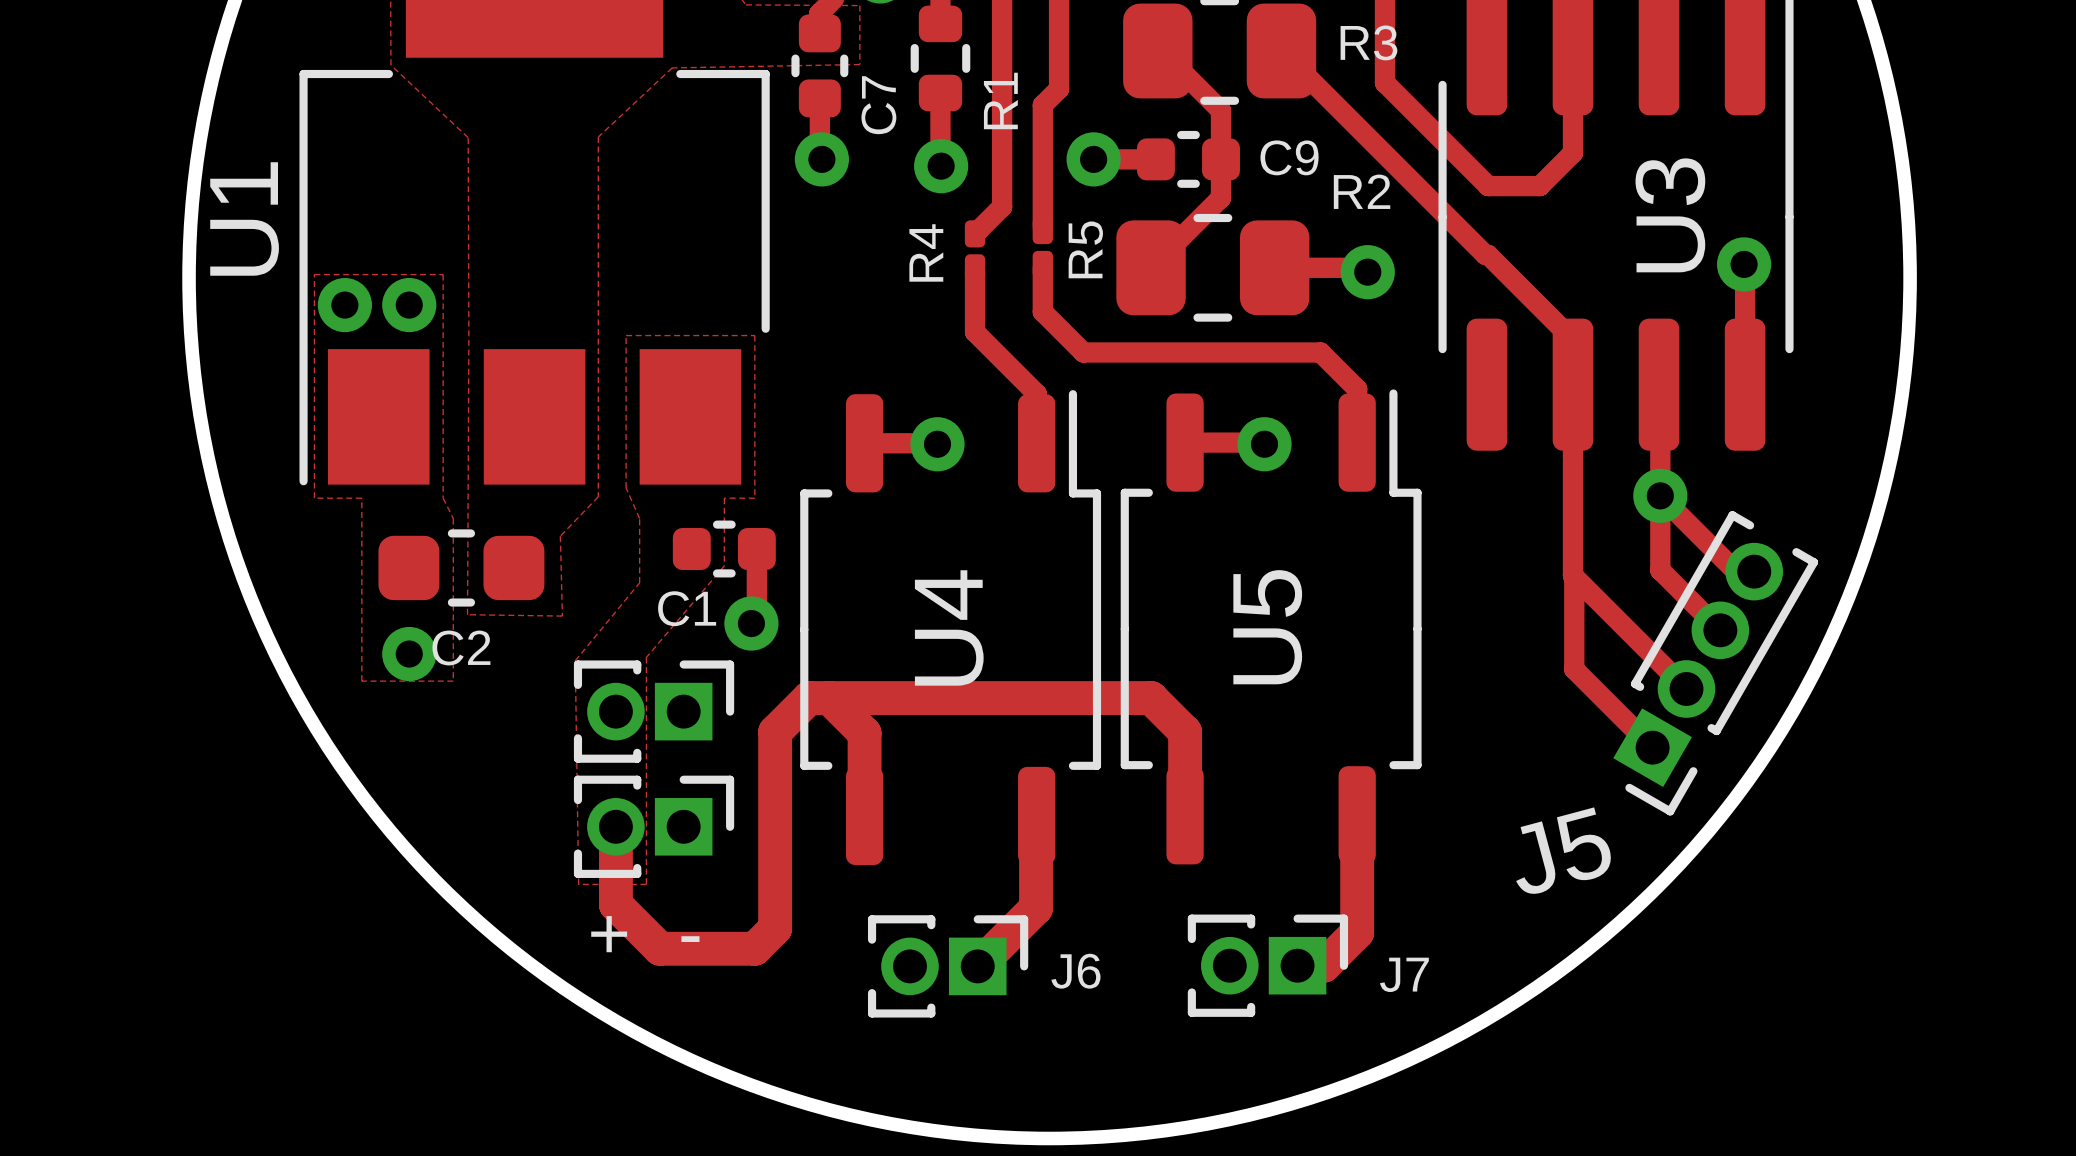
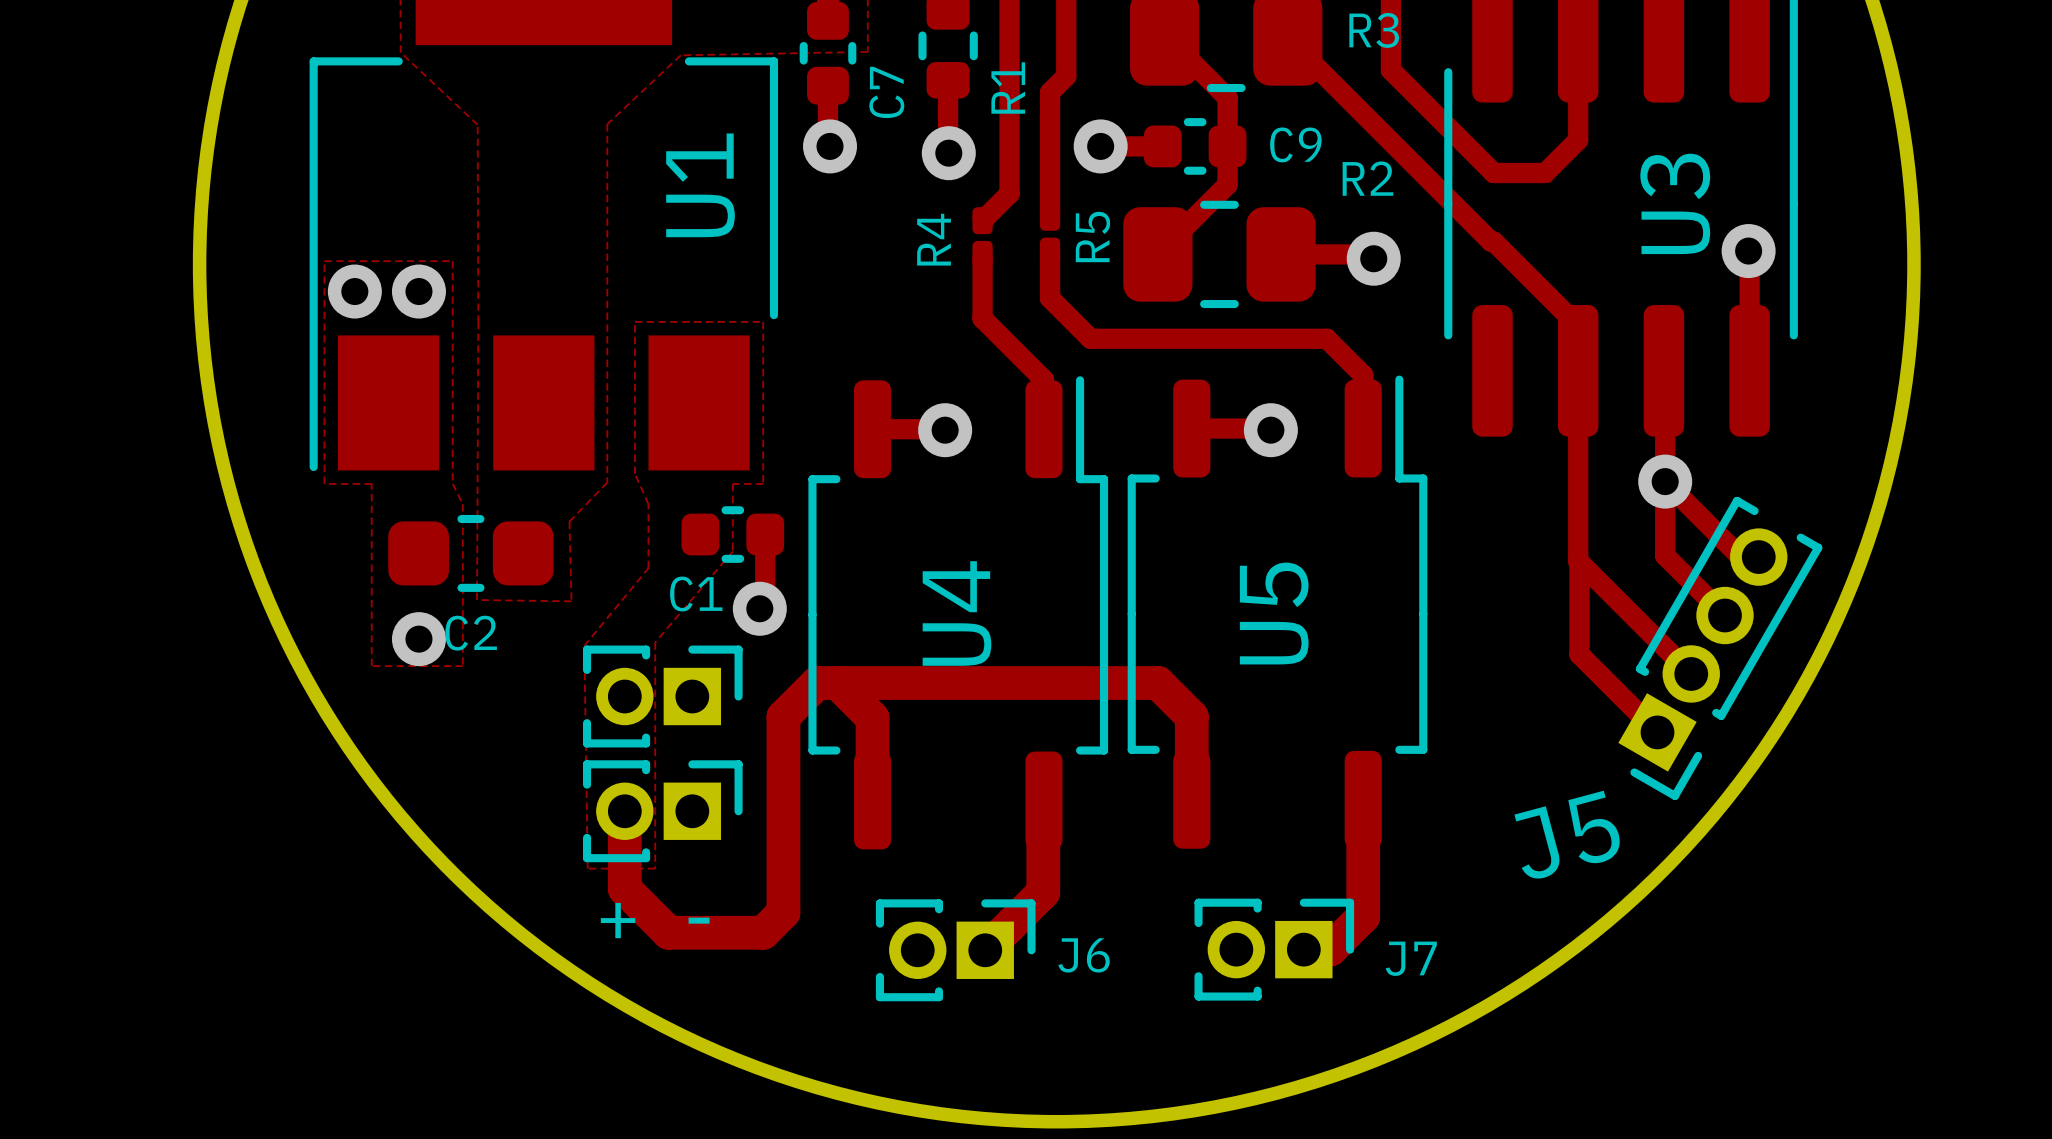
U1 name position: U1 (244, 218) -> U1 (700, 185)

